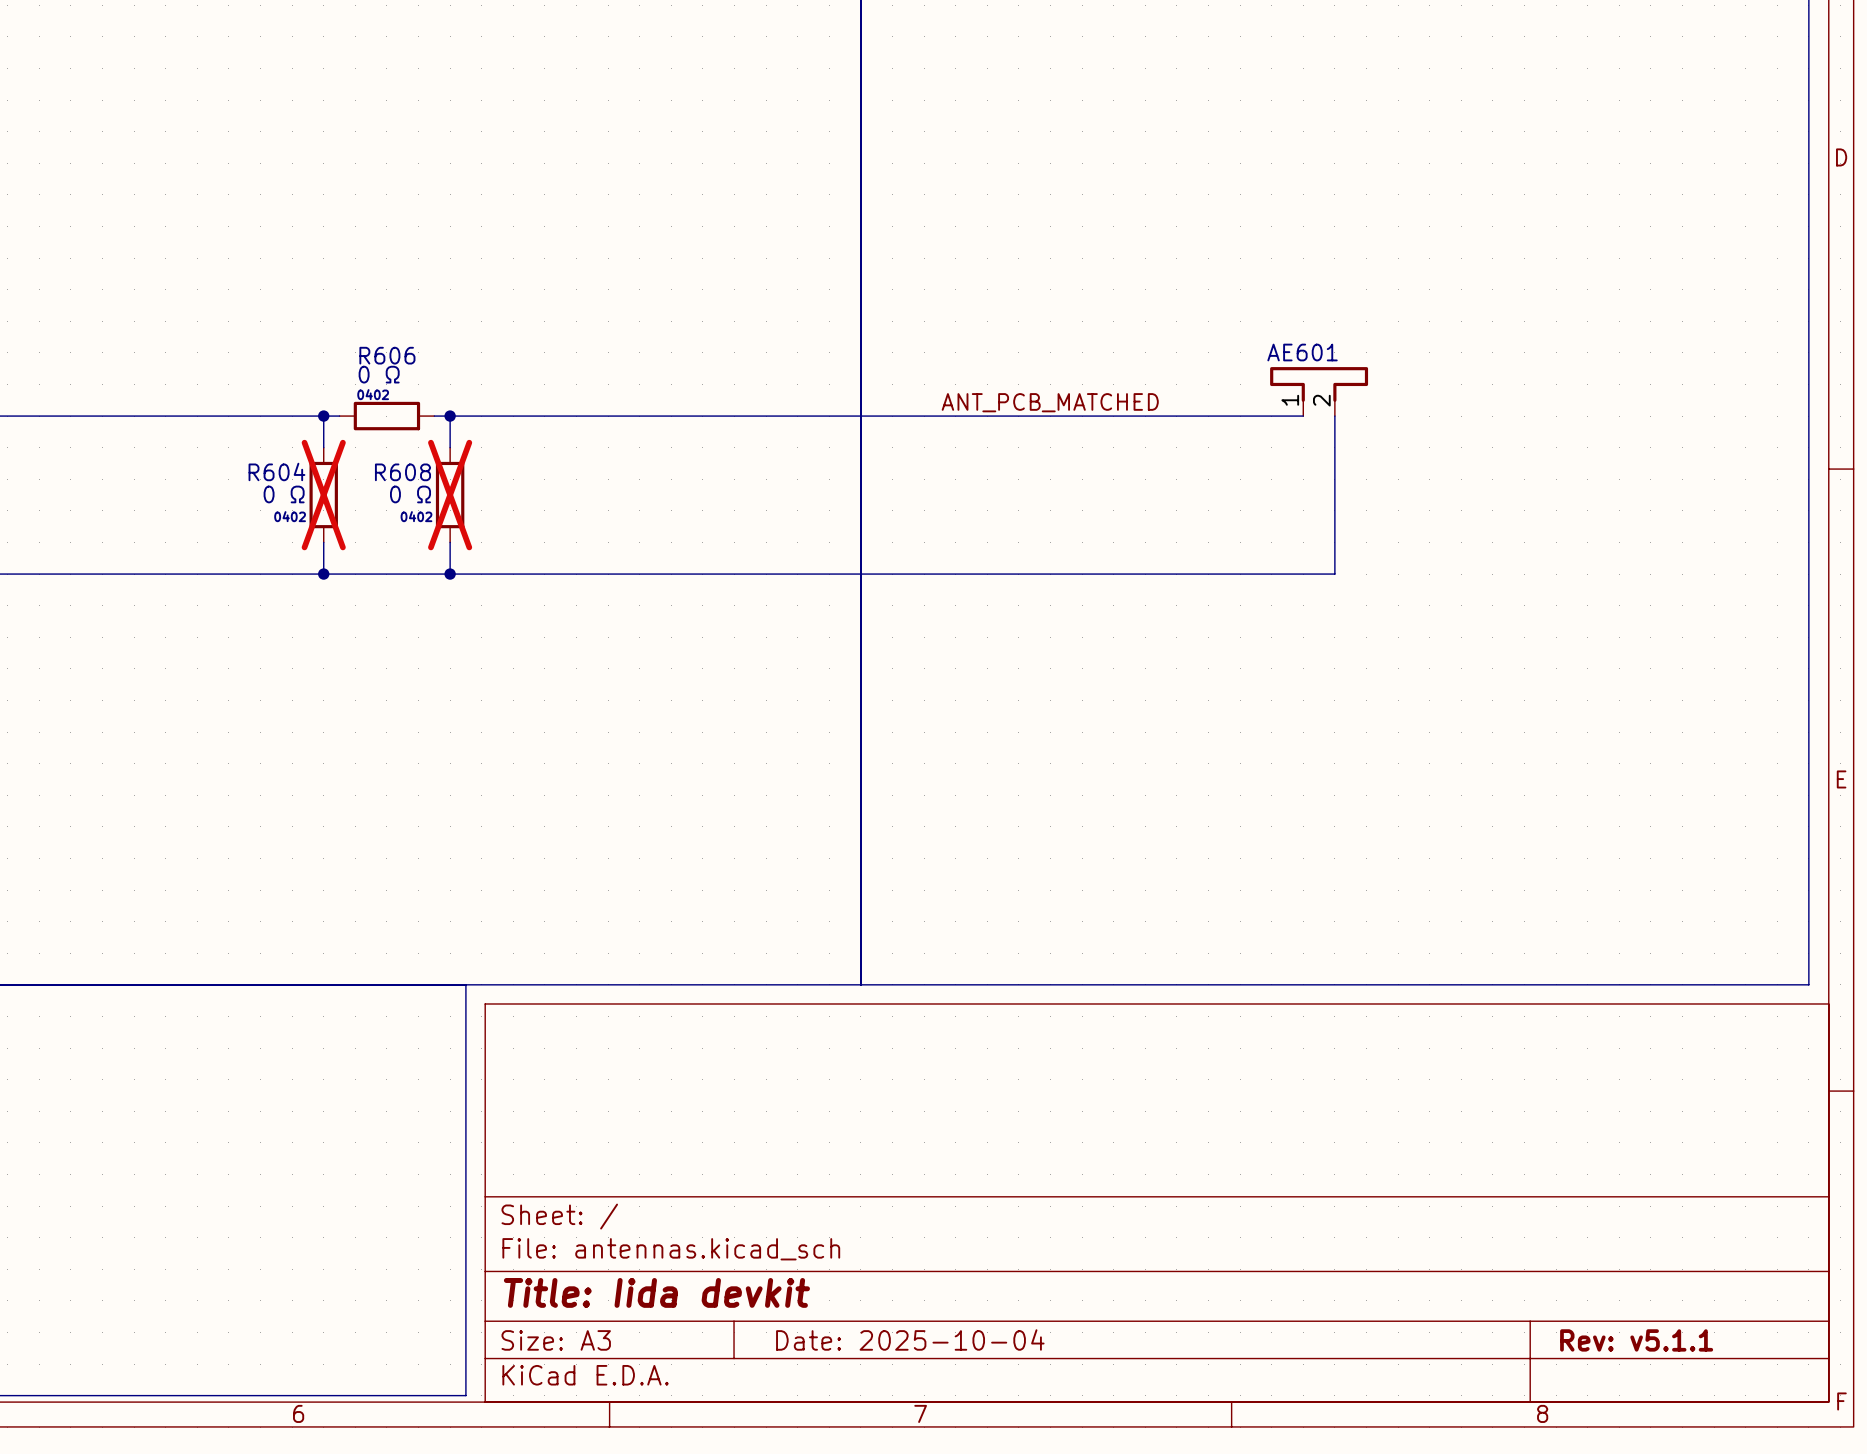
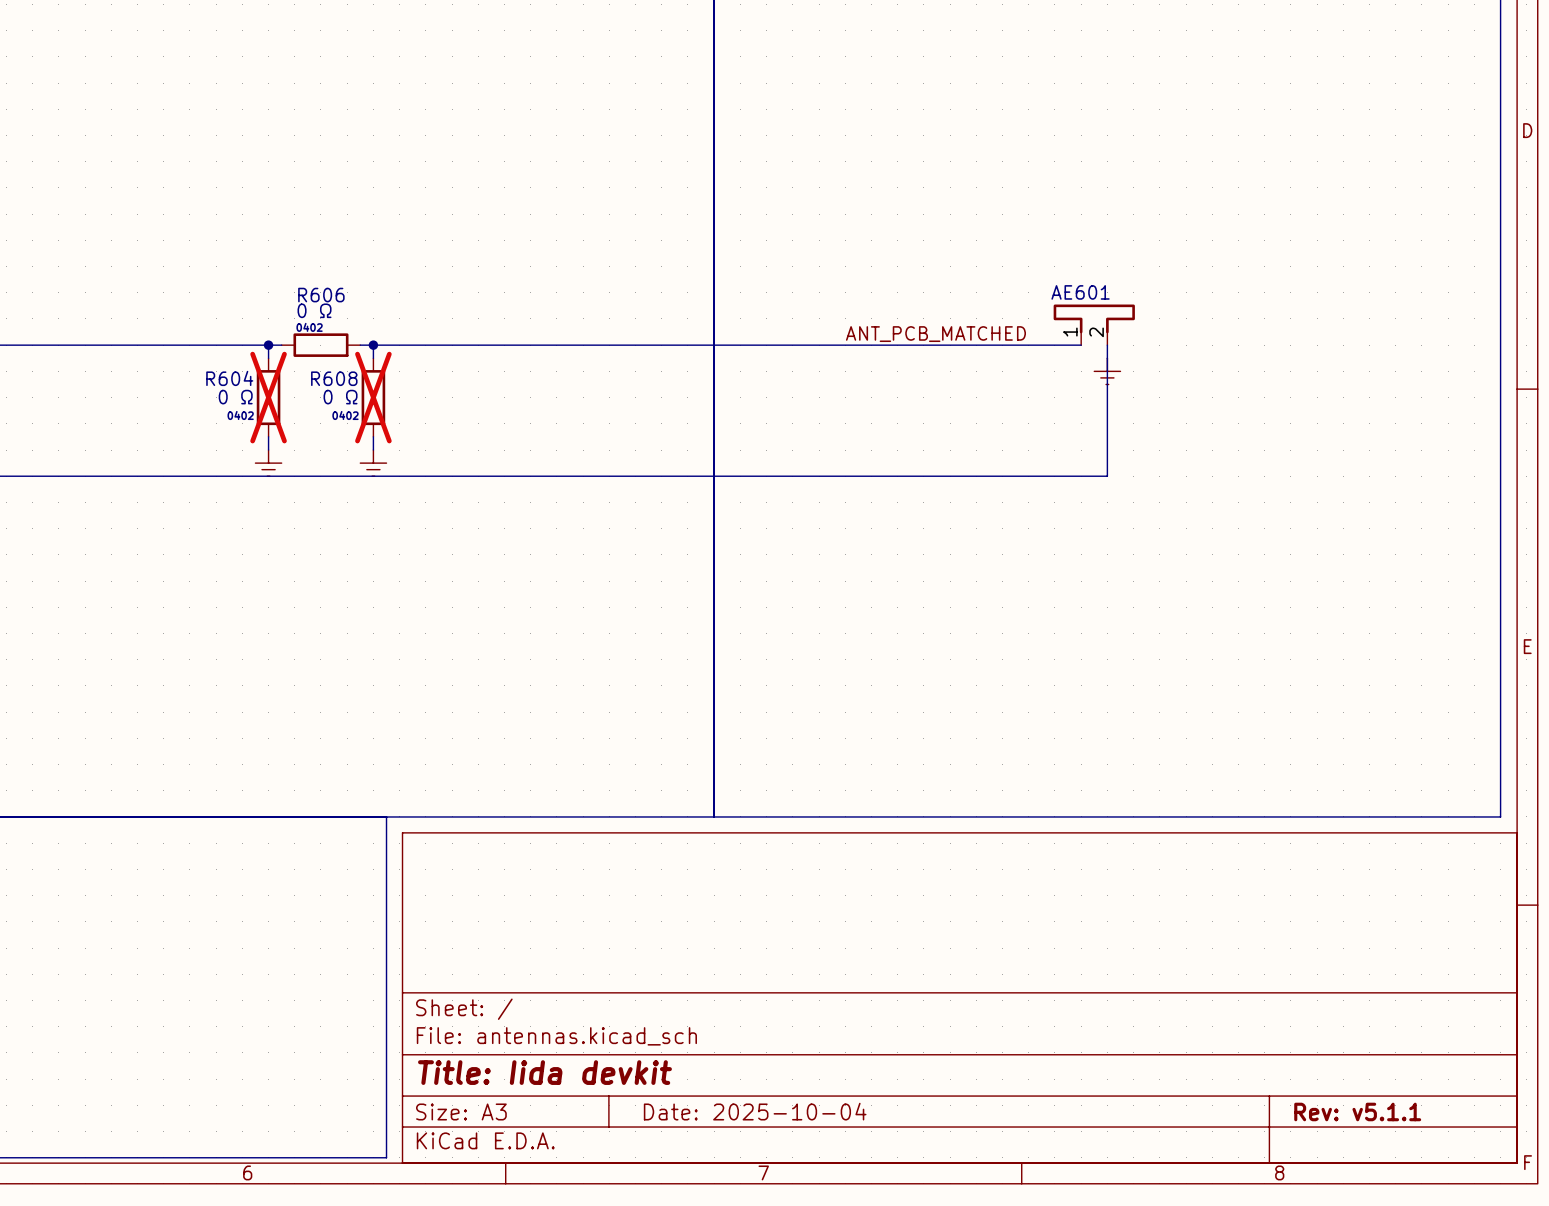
label position: ANT_PCB_MATCHED (1050, 402) -> ANT_PCB_MATCHED (935, 334)
power symbol: none -> (1107, 371)
R604 position: (323, 495) -> (268, 397)
R608 position: (450, 495) -> (373, 397)
power symbol: none -> (268, 463)
power symbol: none -> (373, 463)
junction: (323, 574) -> none
junction: (450, 574) -> none

